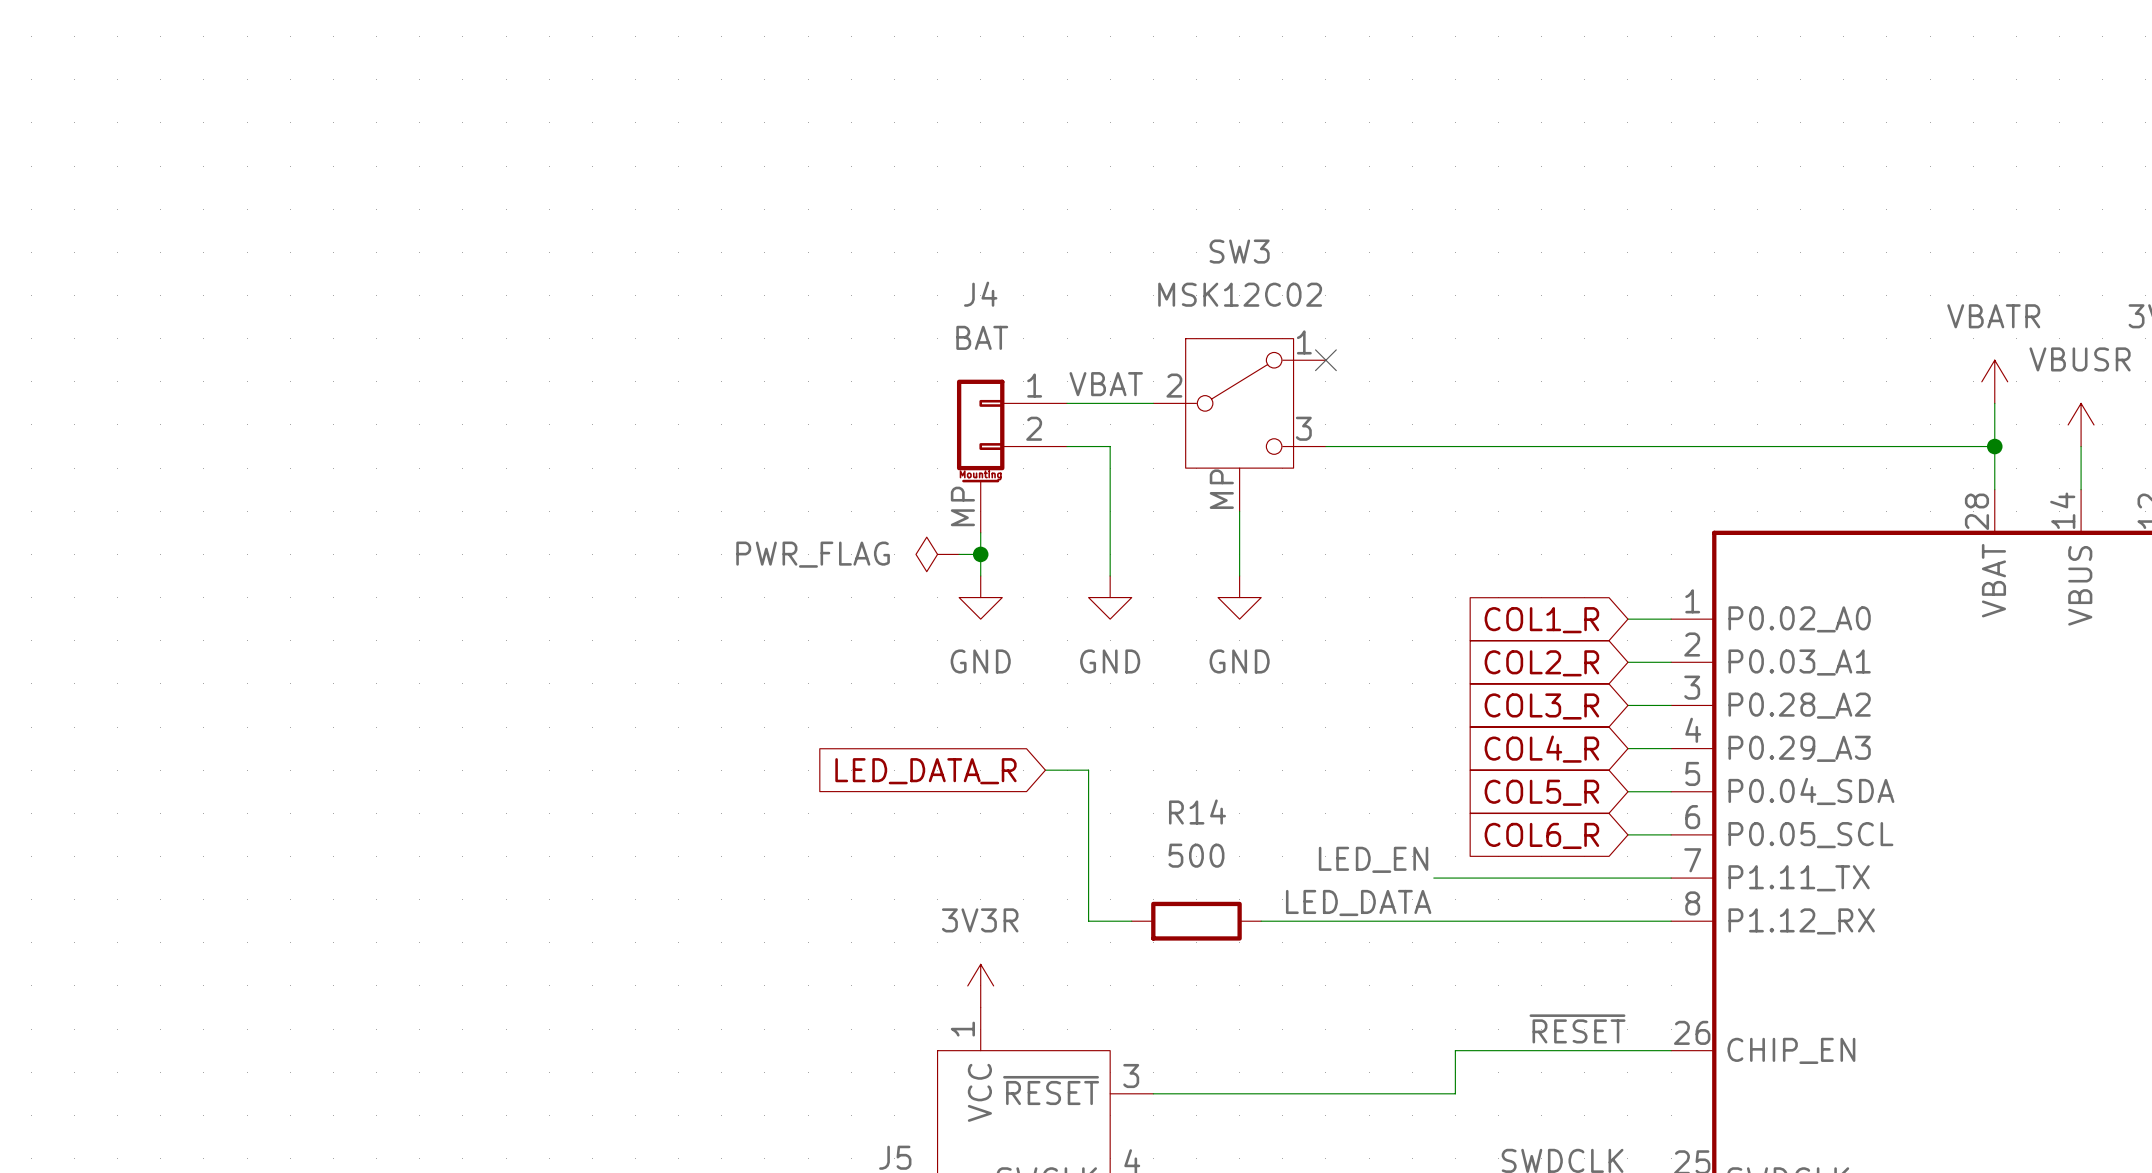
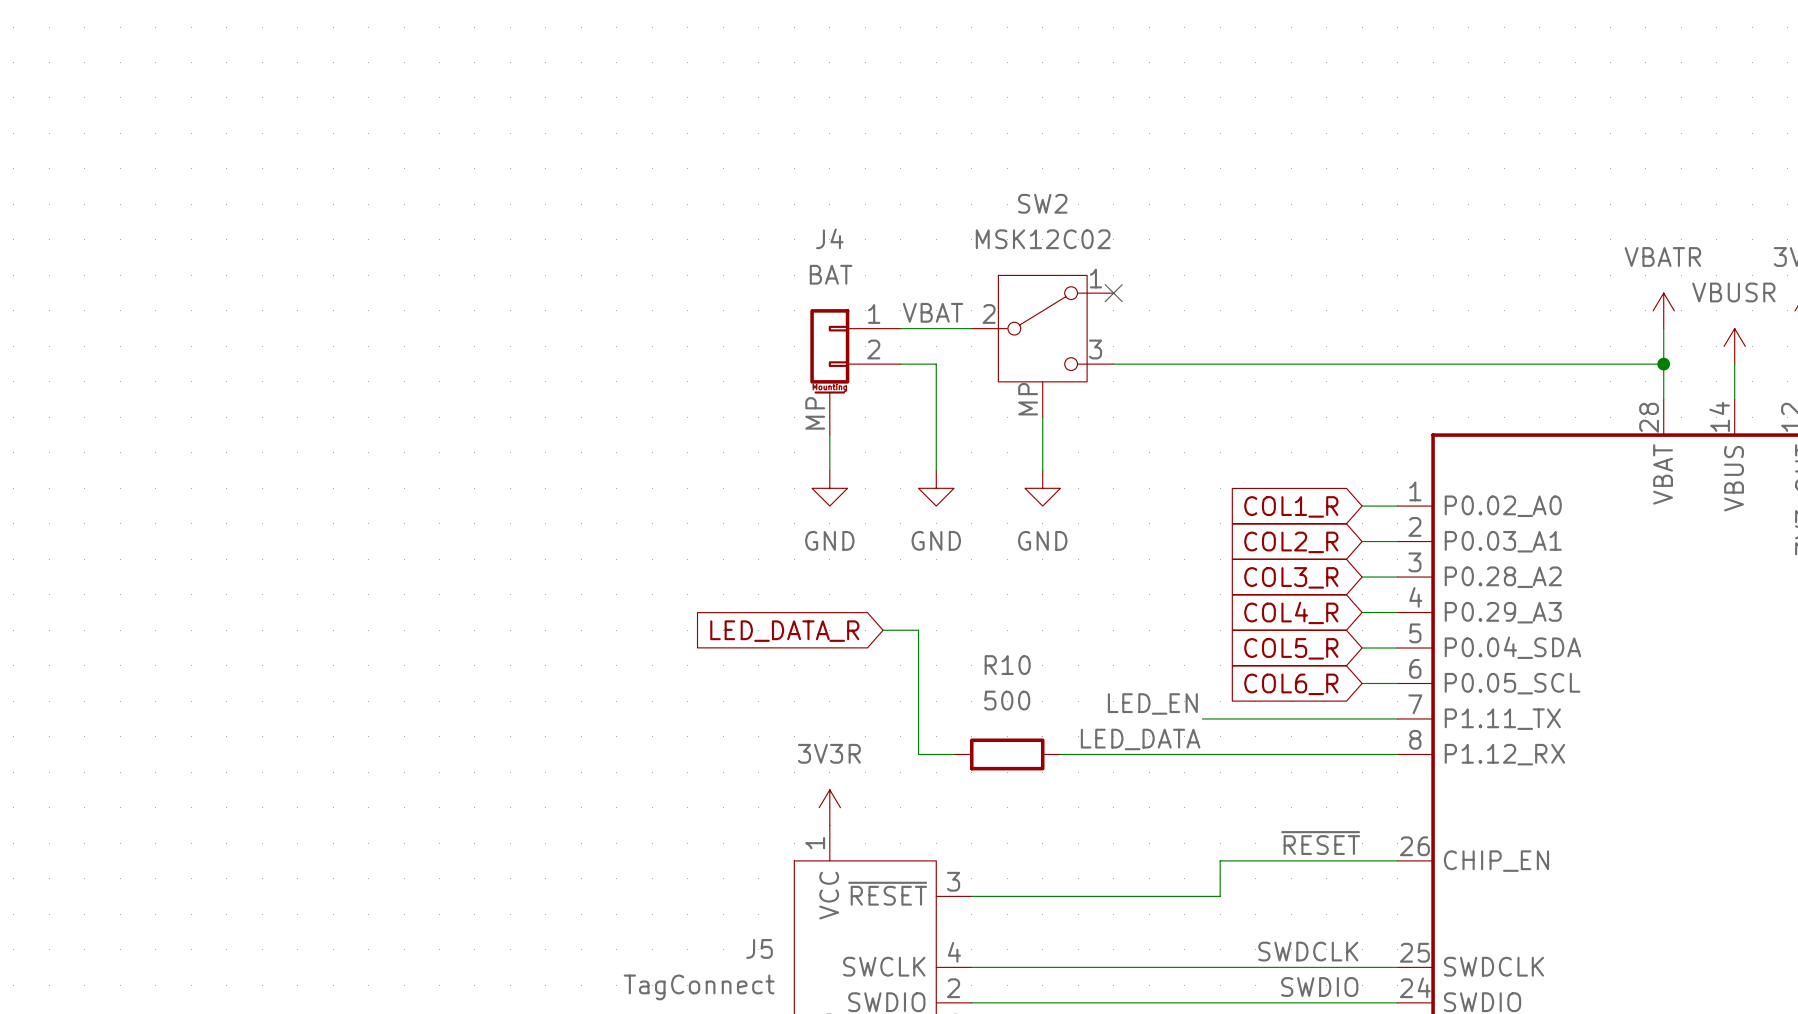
SW3 name: SW3 (1239, 251) -> SW2 (1042, 203)
power symbol: PWR_FLAG (937, 554) -> none
wire: (959, 554) (980, 554) -> none
junction: (980, 554) -> none
R14 name: R14 (1197, 812) -> R10 (1007, 665)

